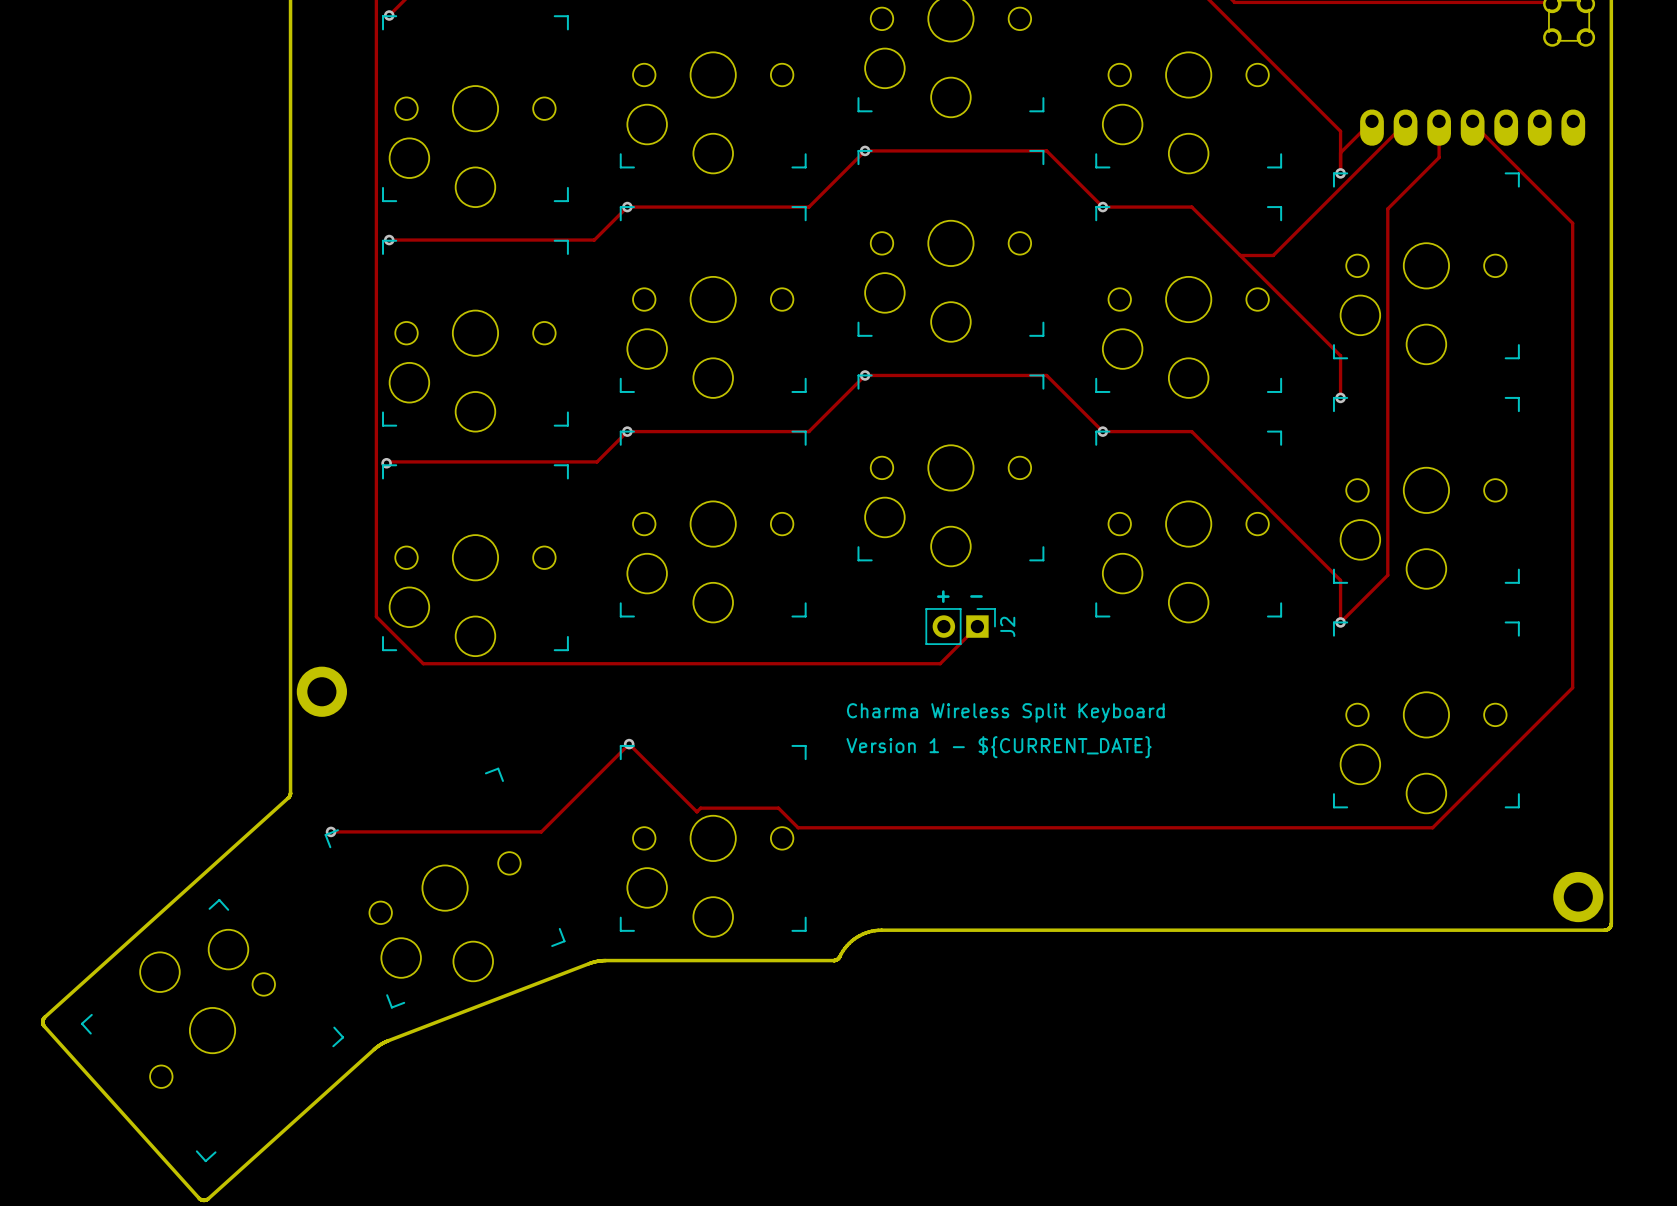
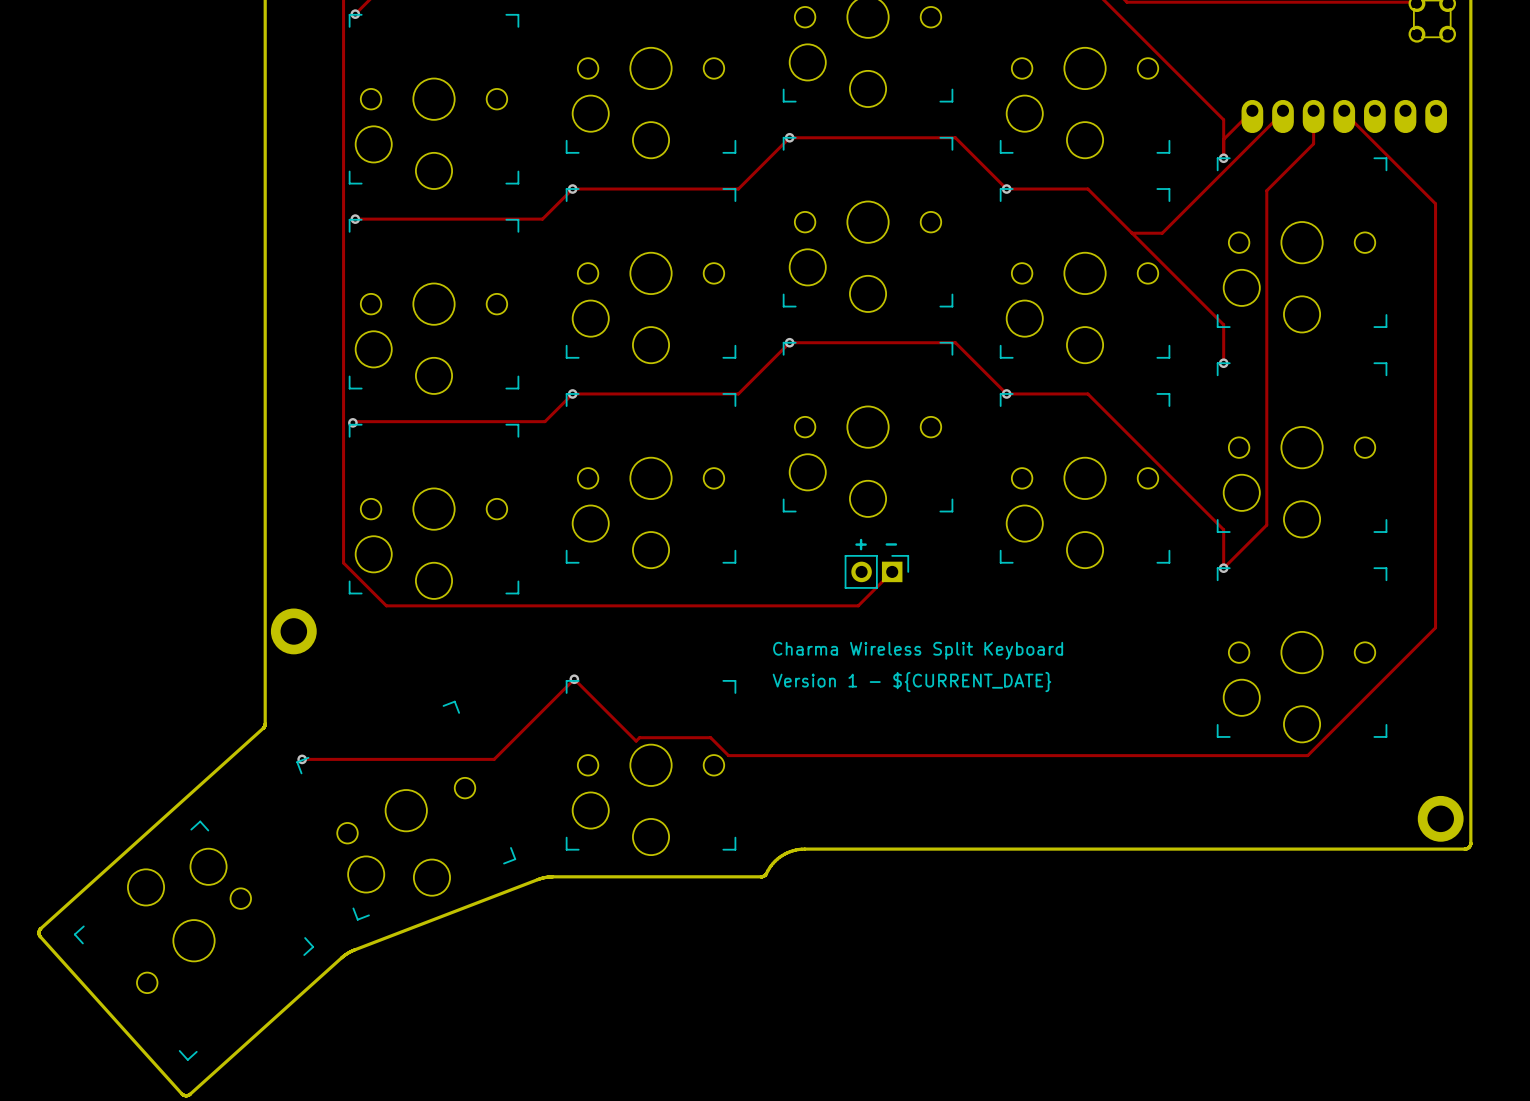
J2 name: J2 (1007, 626) -> none

